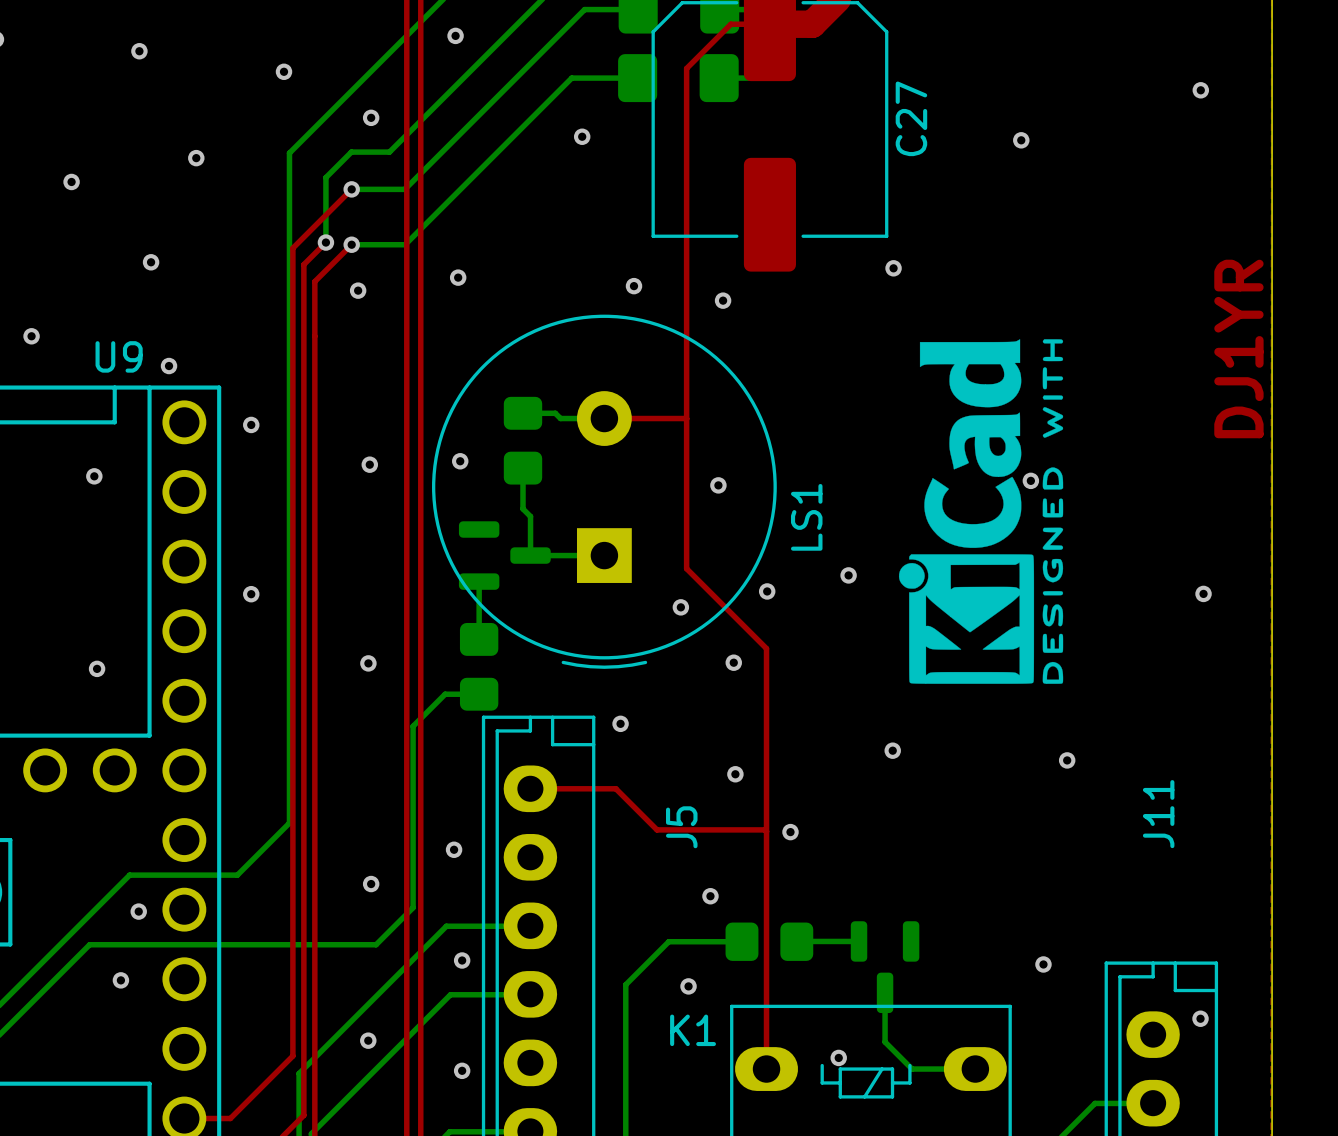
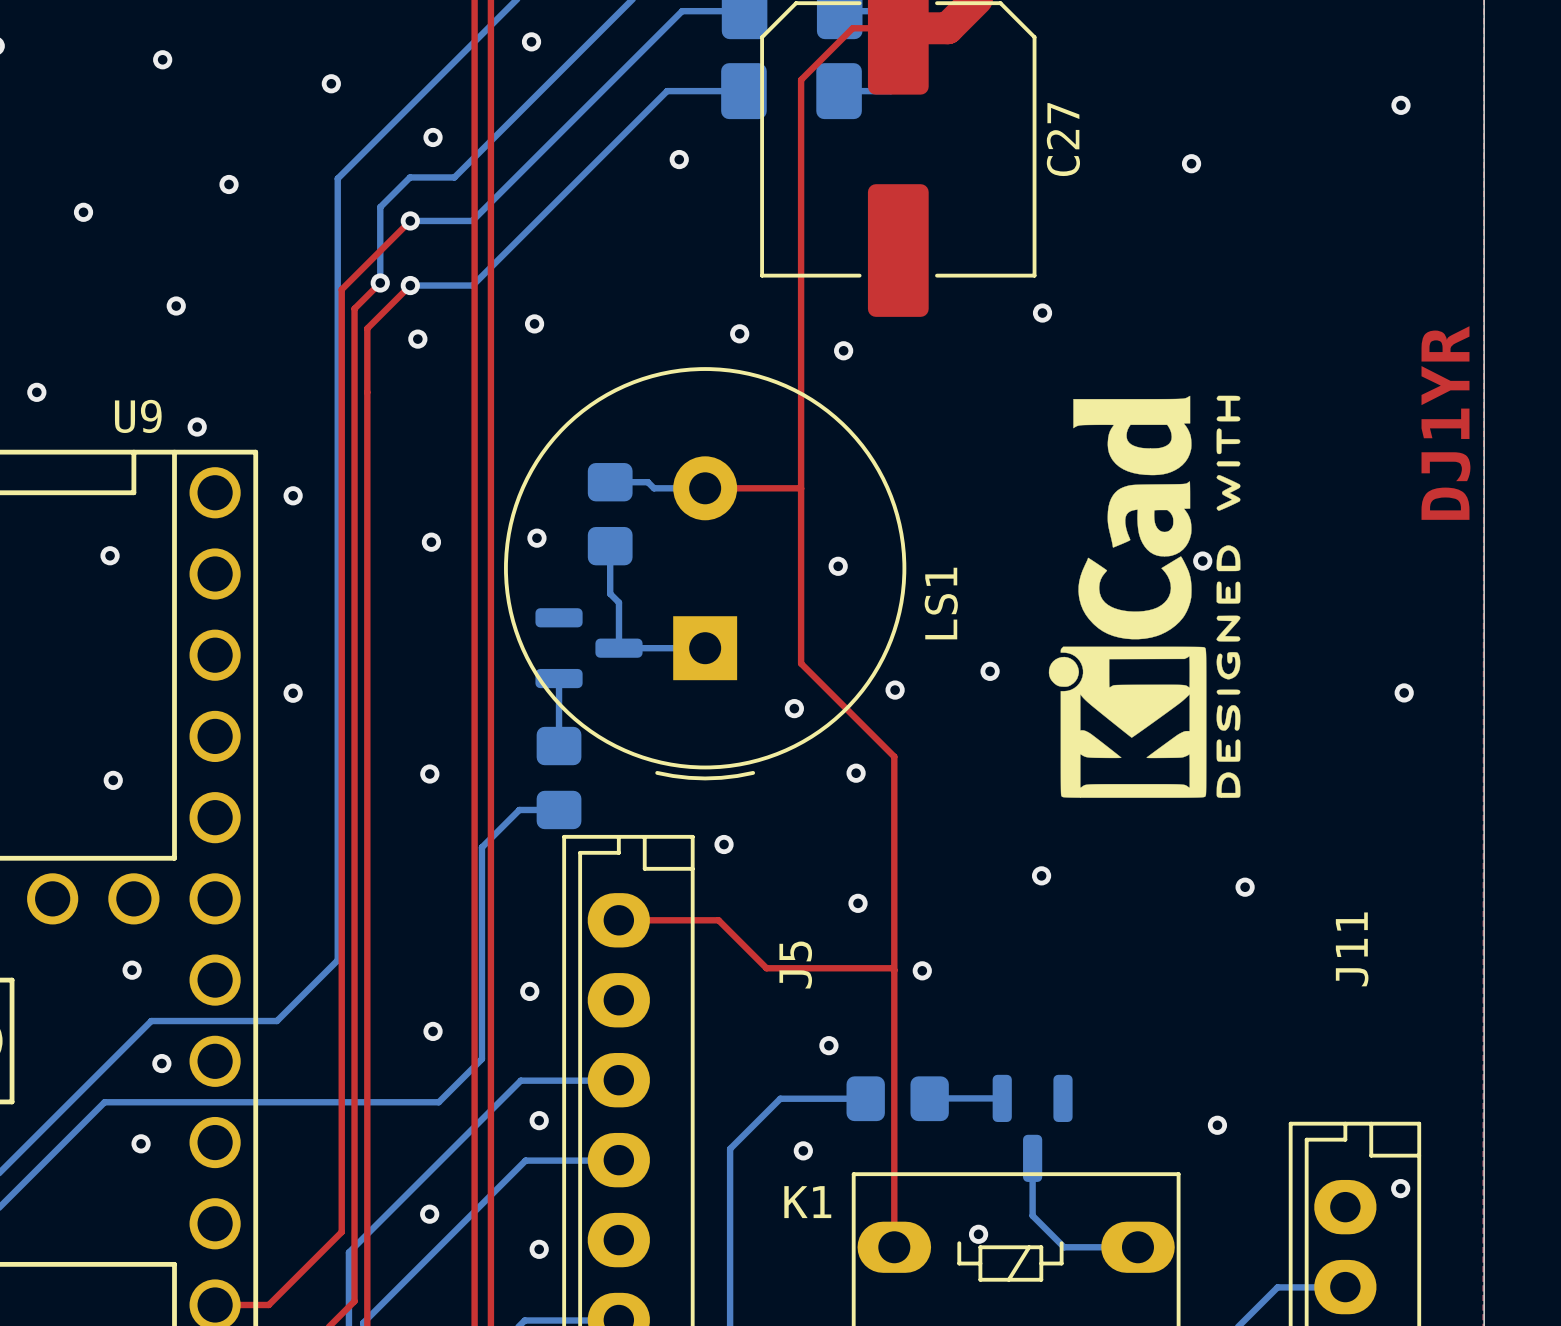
via: none -> (132, 970)

